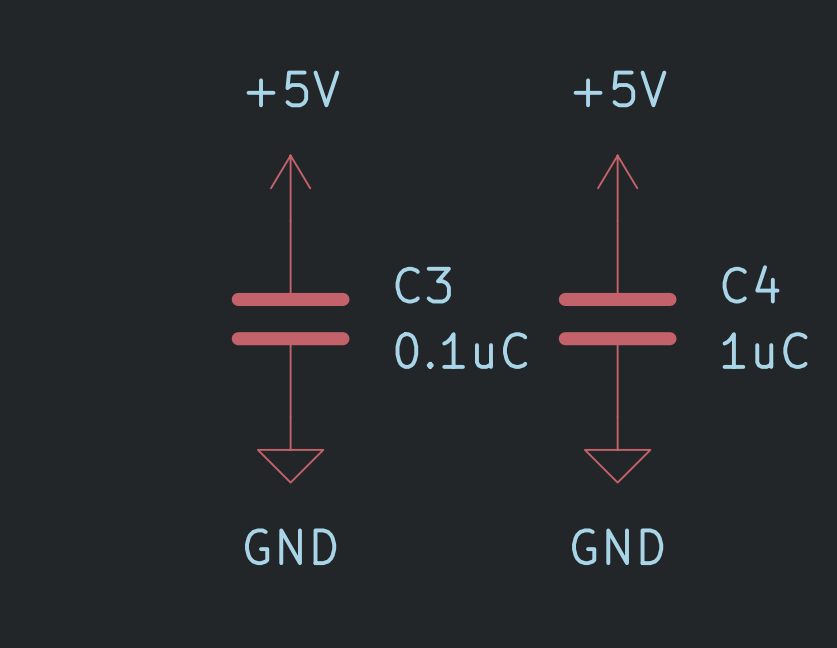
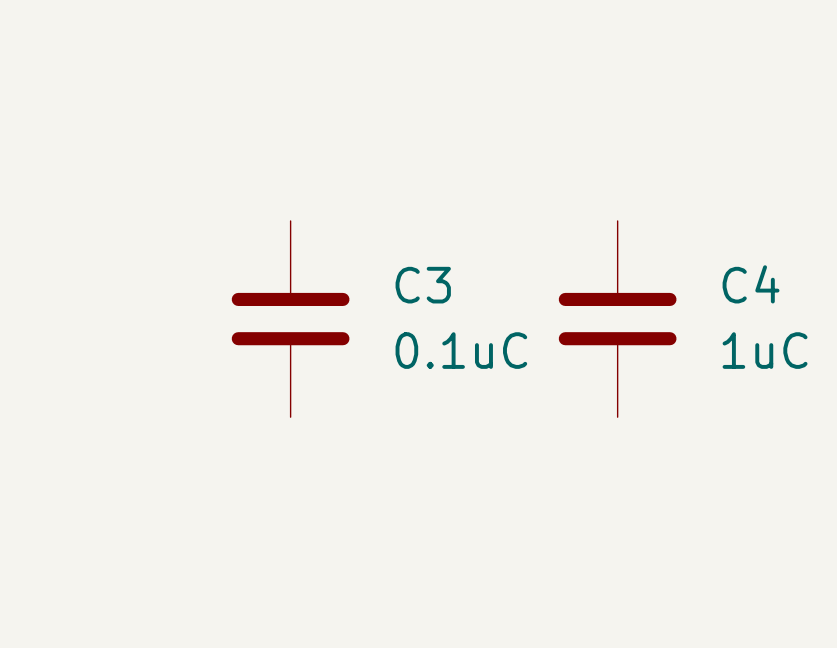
power symbol: +5V (290, 188) -> none
power symbol: +5V (617, 188) -> none
power symbol: GND (290, 449) -> none
power symbol: GND (617, 449) -> none

